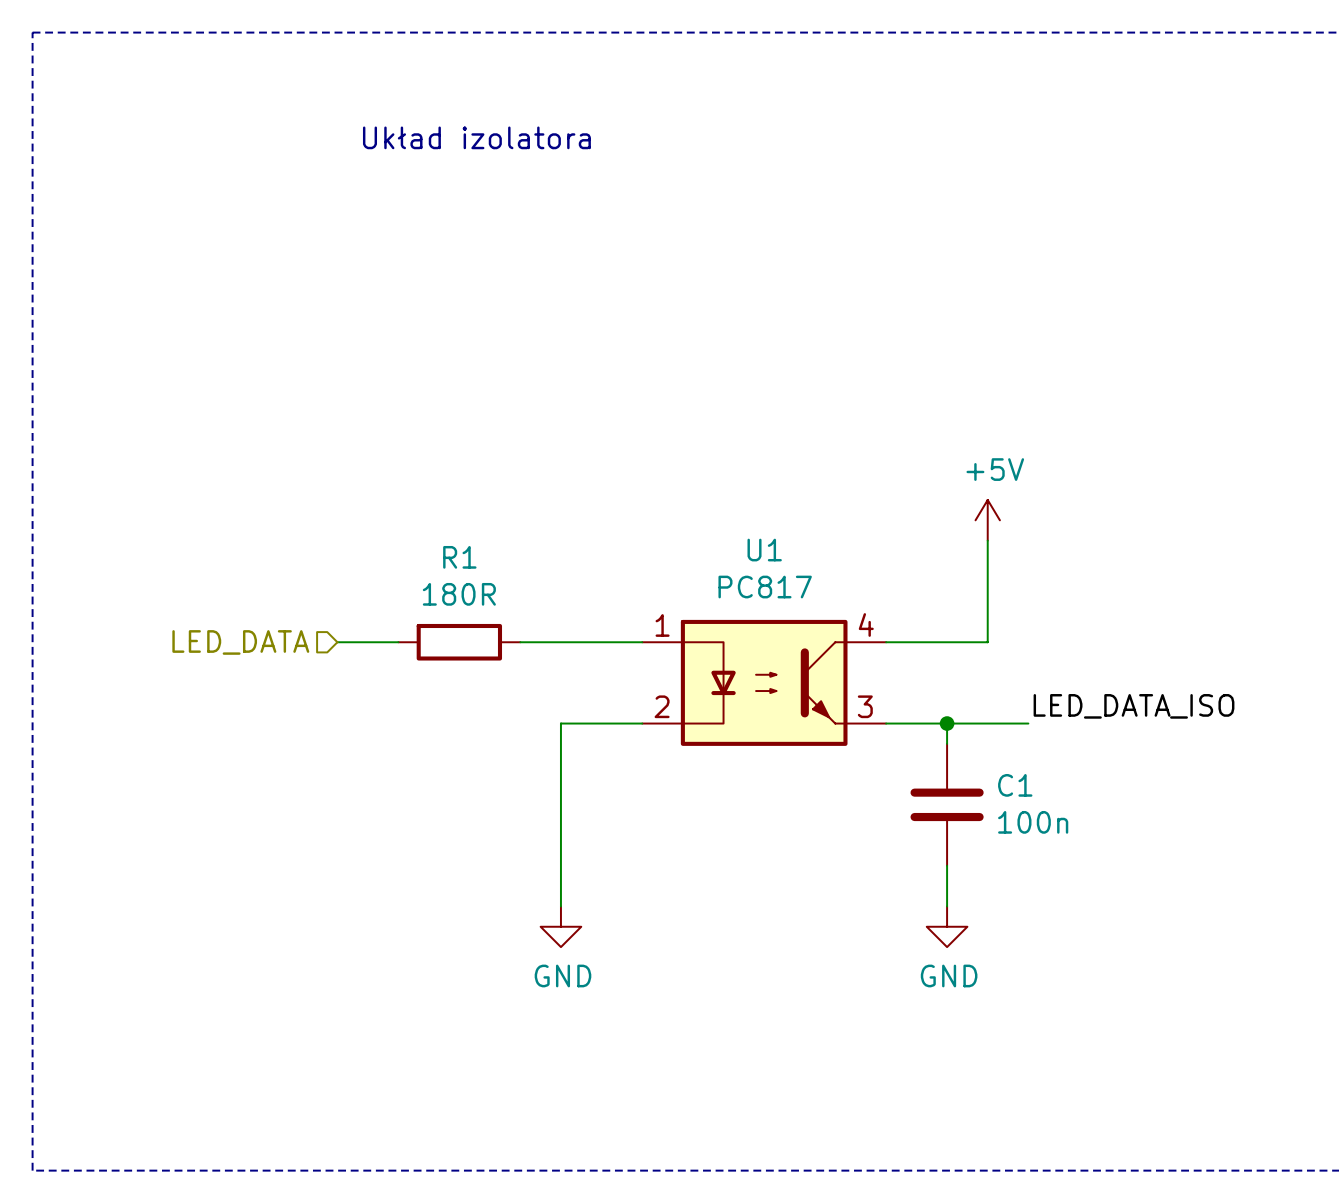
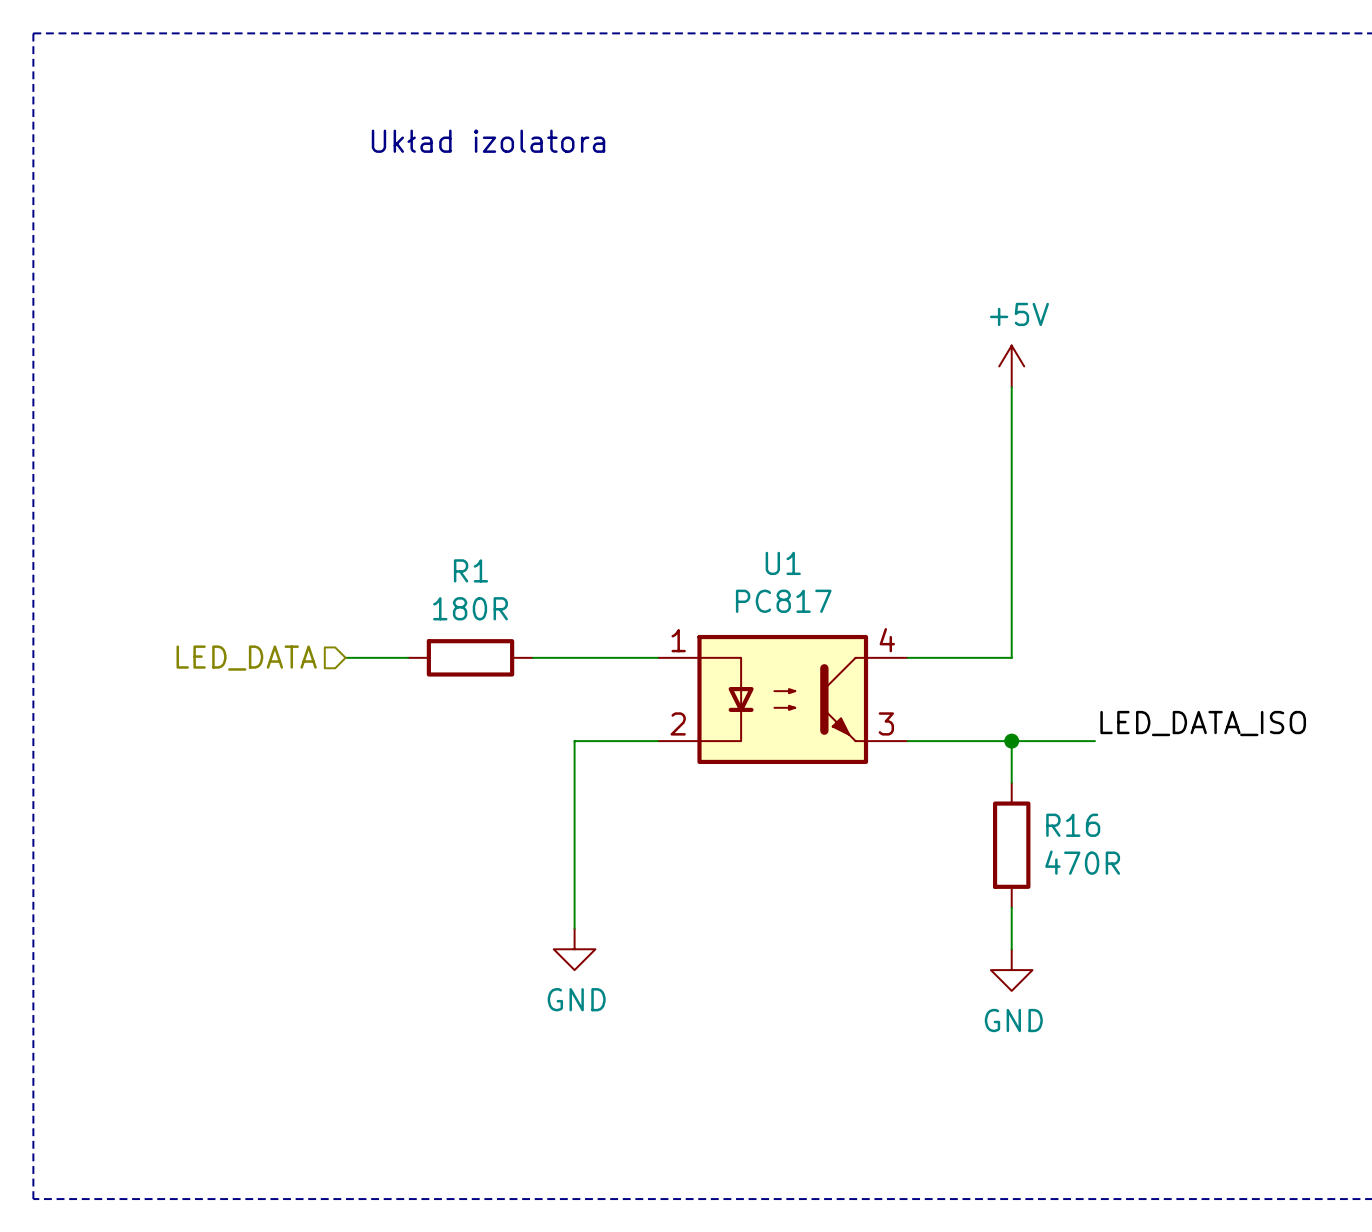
wire: none -> (1011, 387) (1011, 553)
power symbol position: +5V (987, 520) -> +5V (1011, 366)
label position: LED_DATA_ISO (1134, 706) -> LED_DATA_ISO (1203, 723)
wire: (947, 723) (947, 743) -> none
junction position: (947, 723) -> (1011, 741)
wire: none -> (1011, 741) (1011, 782)
wire: none -> (1053, 741) (1094, 741)
C1: 100n (947, 804) -> none
R16: none -> 470R (1011, 845)
wire: (947, 865) (947, 906) -> (1011, 907) (1011, 949)
power symbol position: GND (947, 926) -> GND (1011, 970)

